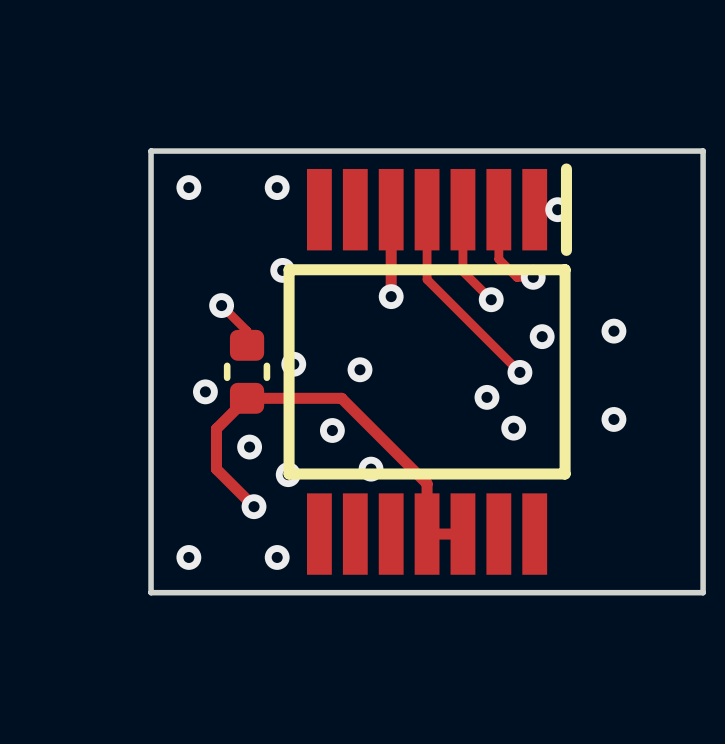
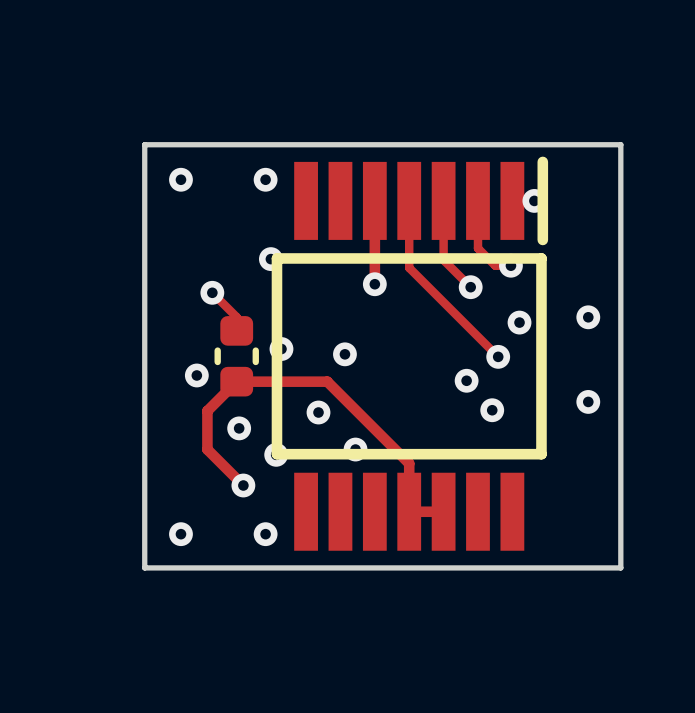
board edge: (647, 151) (703, 151) (703, 592) (647, 592) -> (620, 144) (620, 567)

